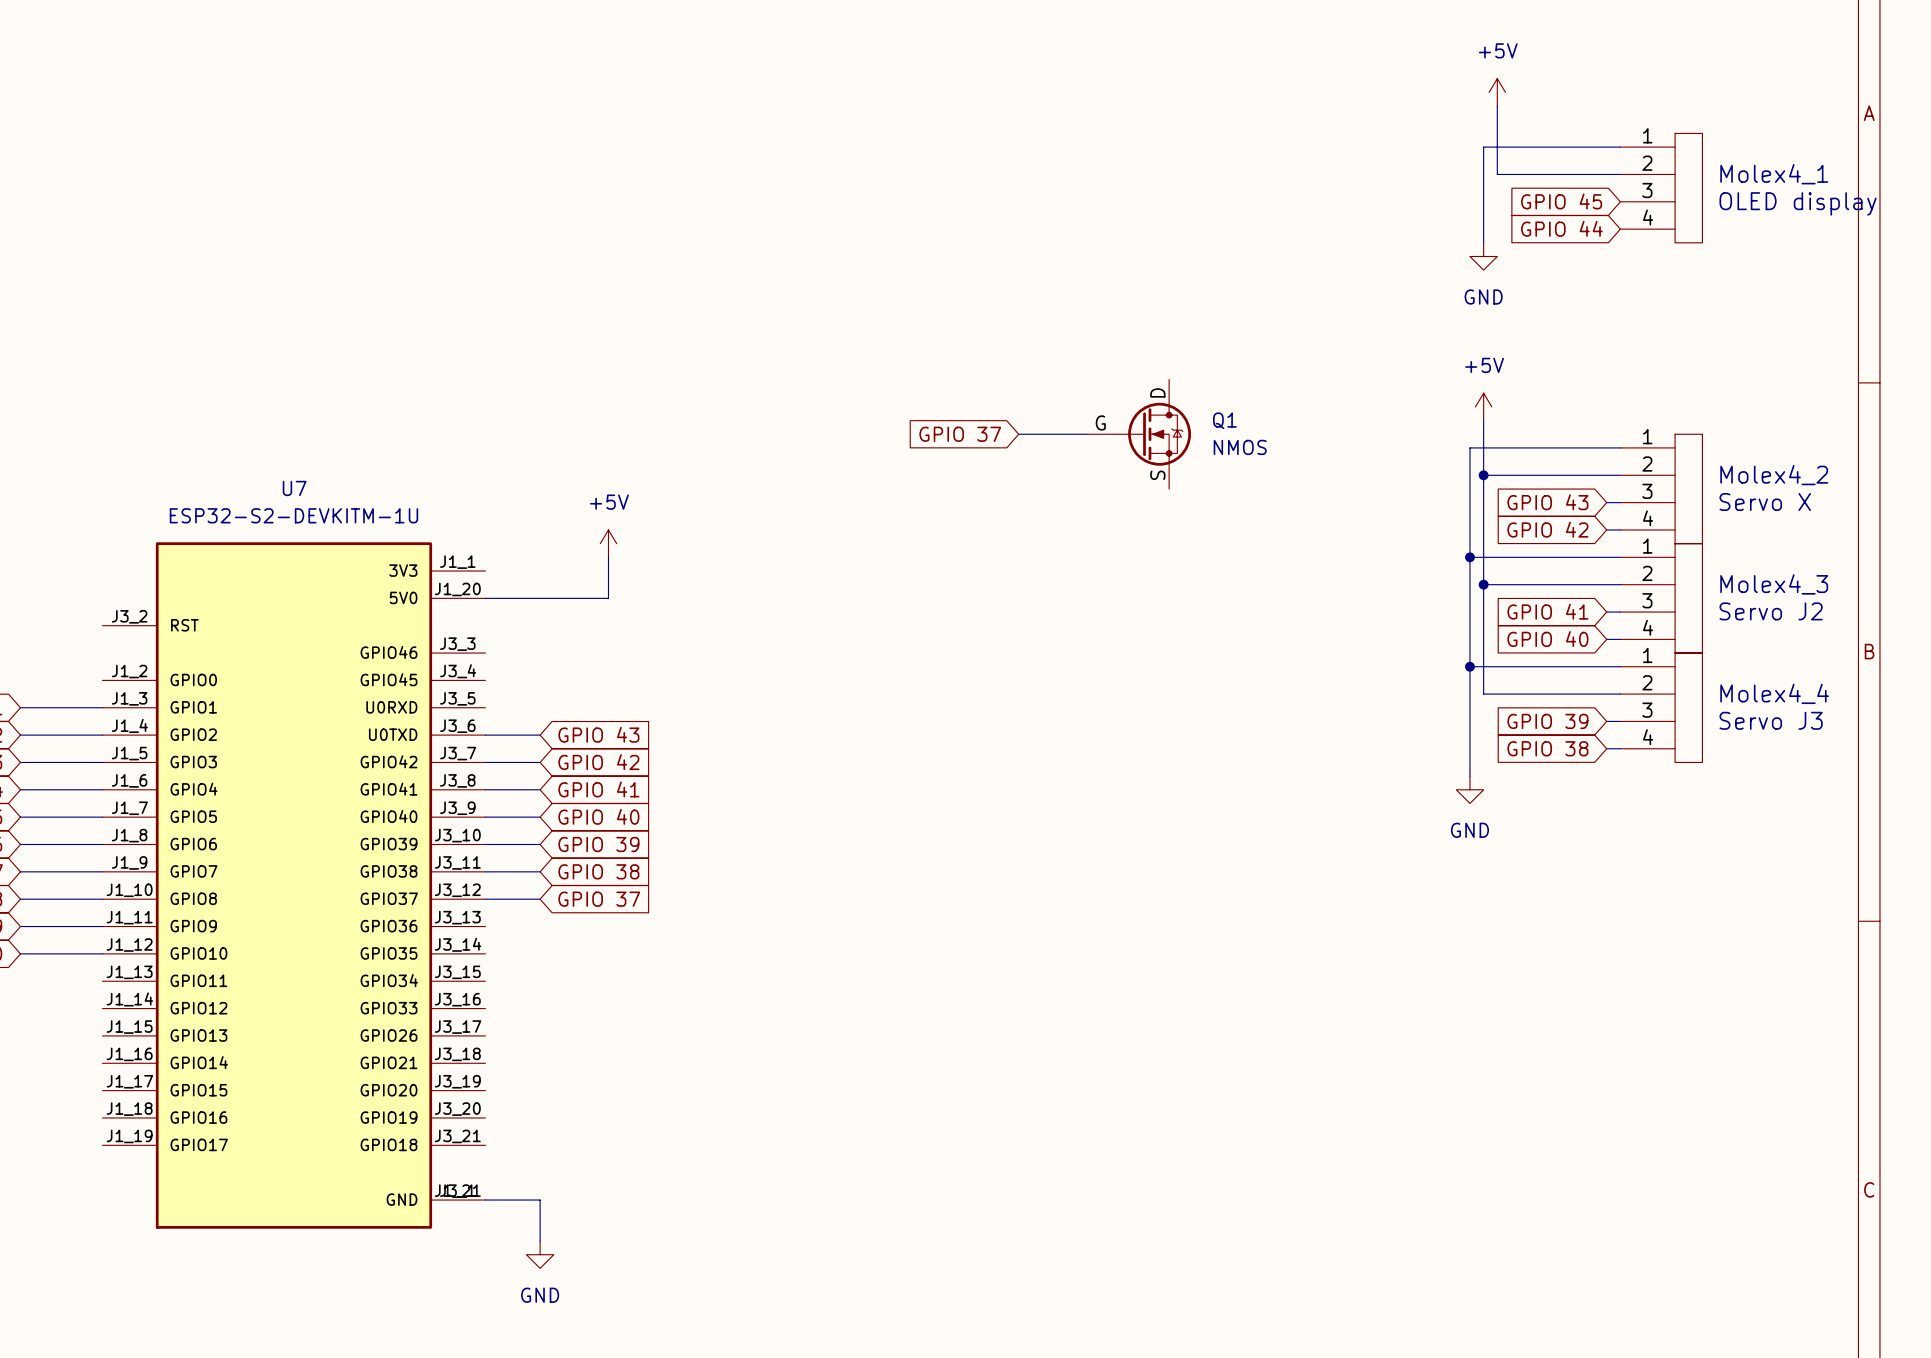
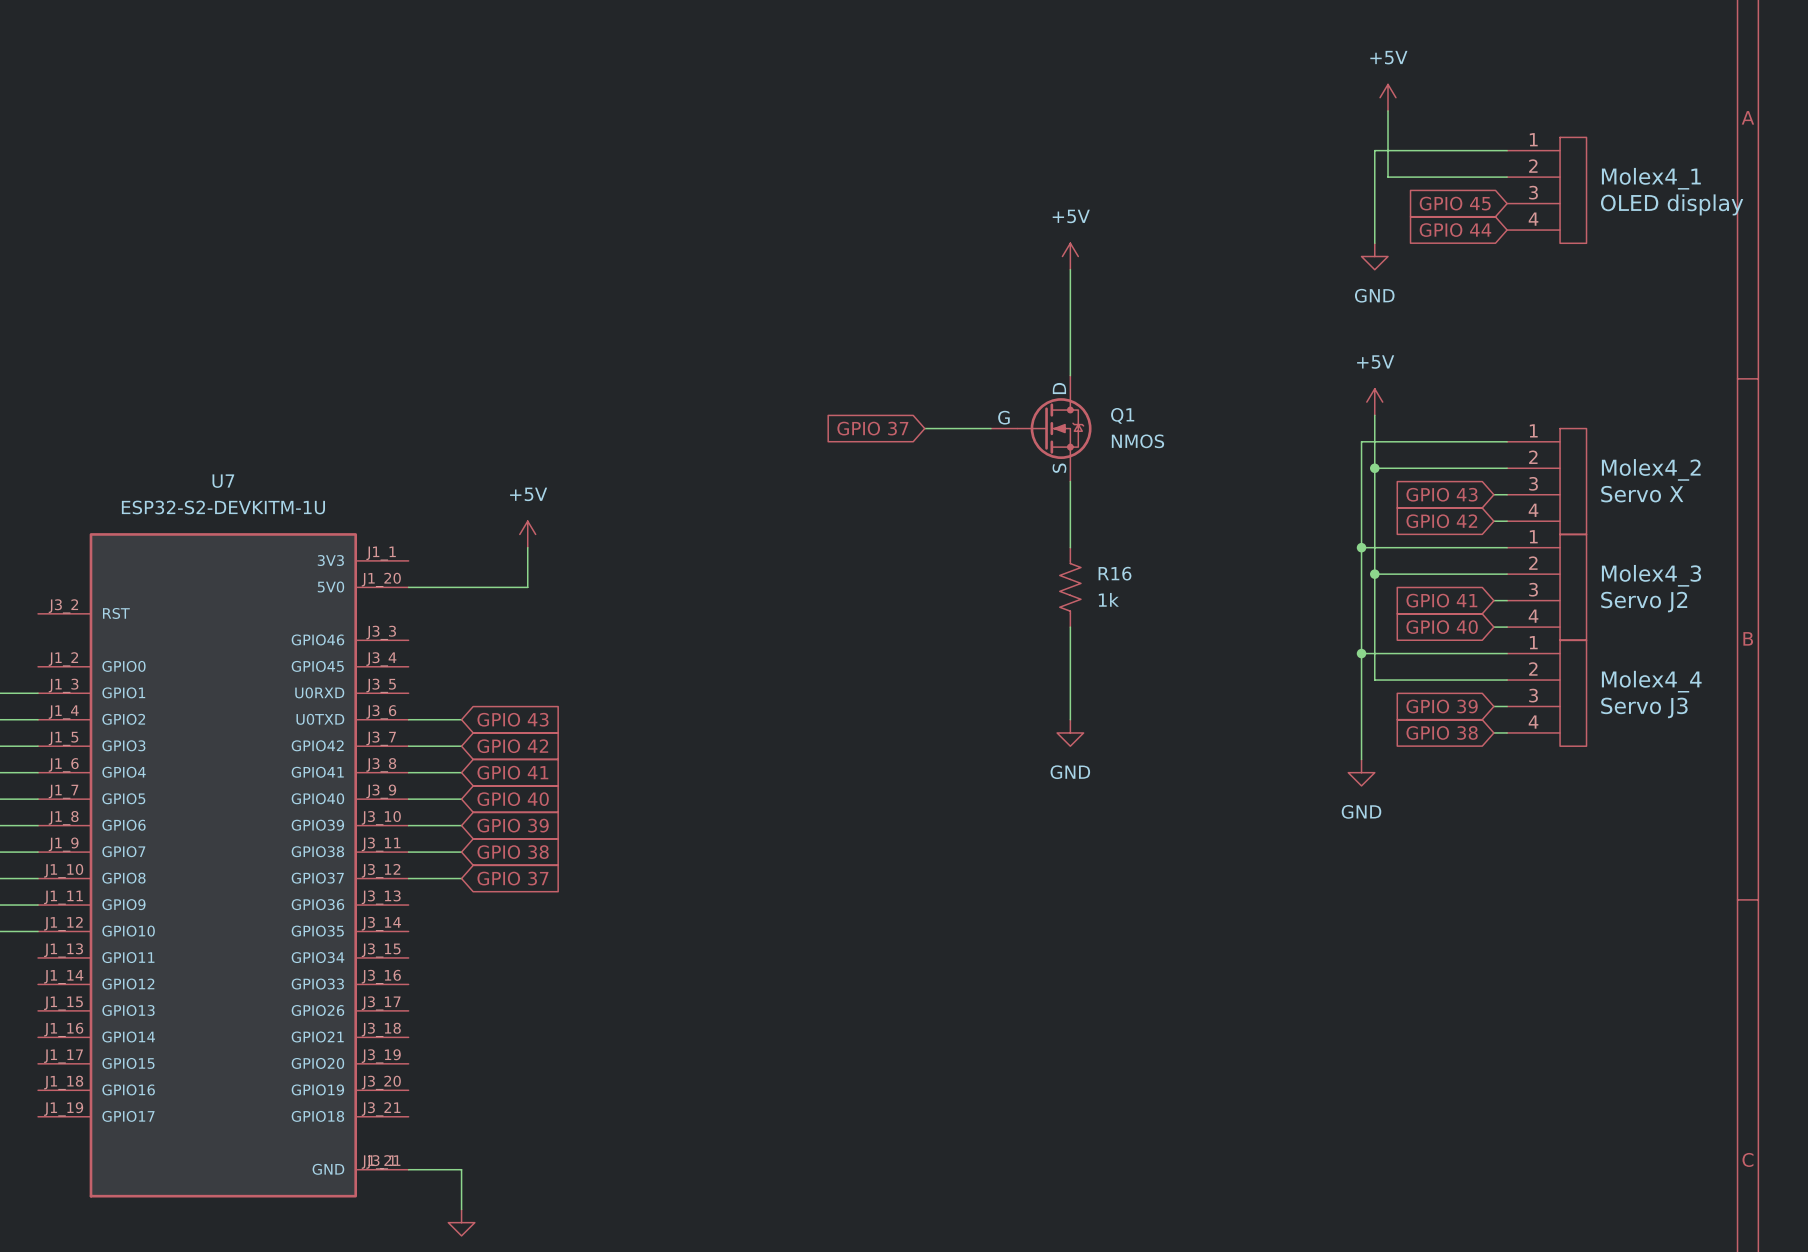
power symbol: none -> +5V (1070, 256)
wire: none -> (1070, 269) (1070, 375)
wire: none -> (1070, 481) (1070, 547)
R16: none -> 1k (1070, 587)
wire: none -> (1070, 627) (1070, 719)
power symbol: none -> GND (1070, 732)

